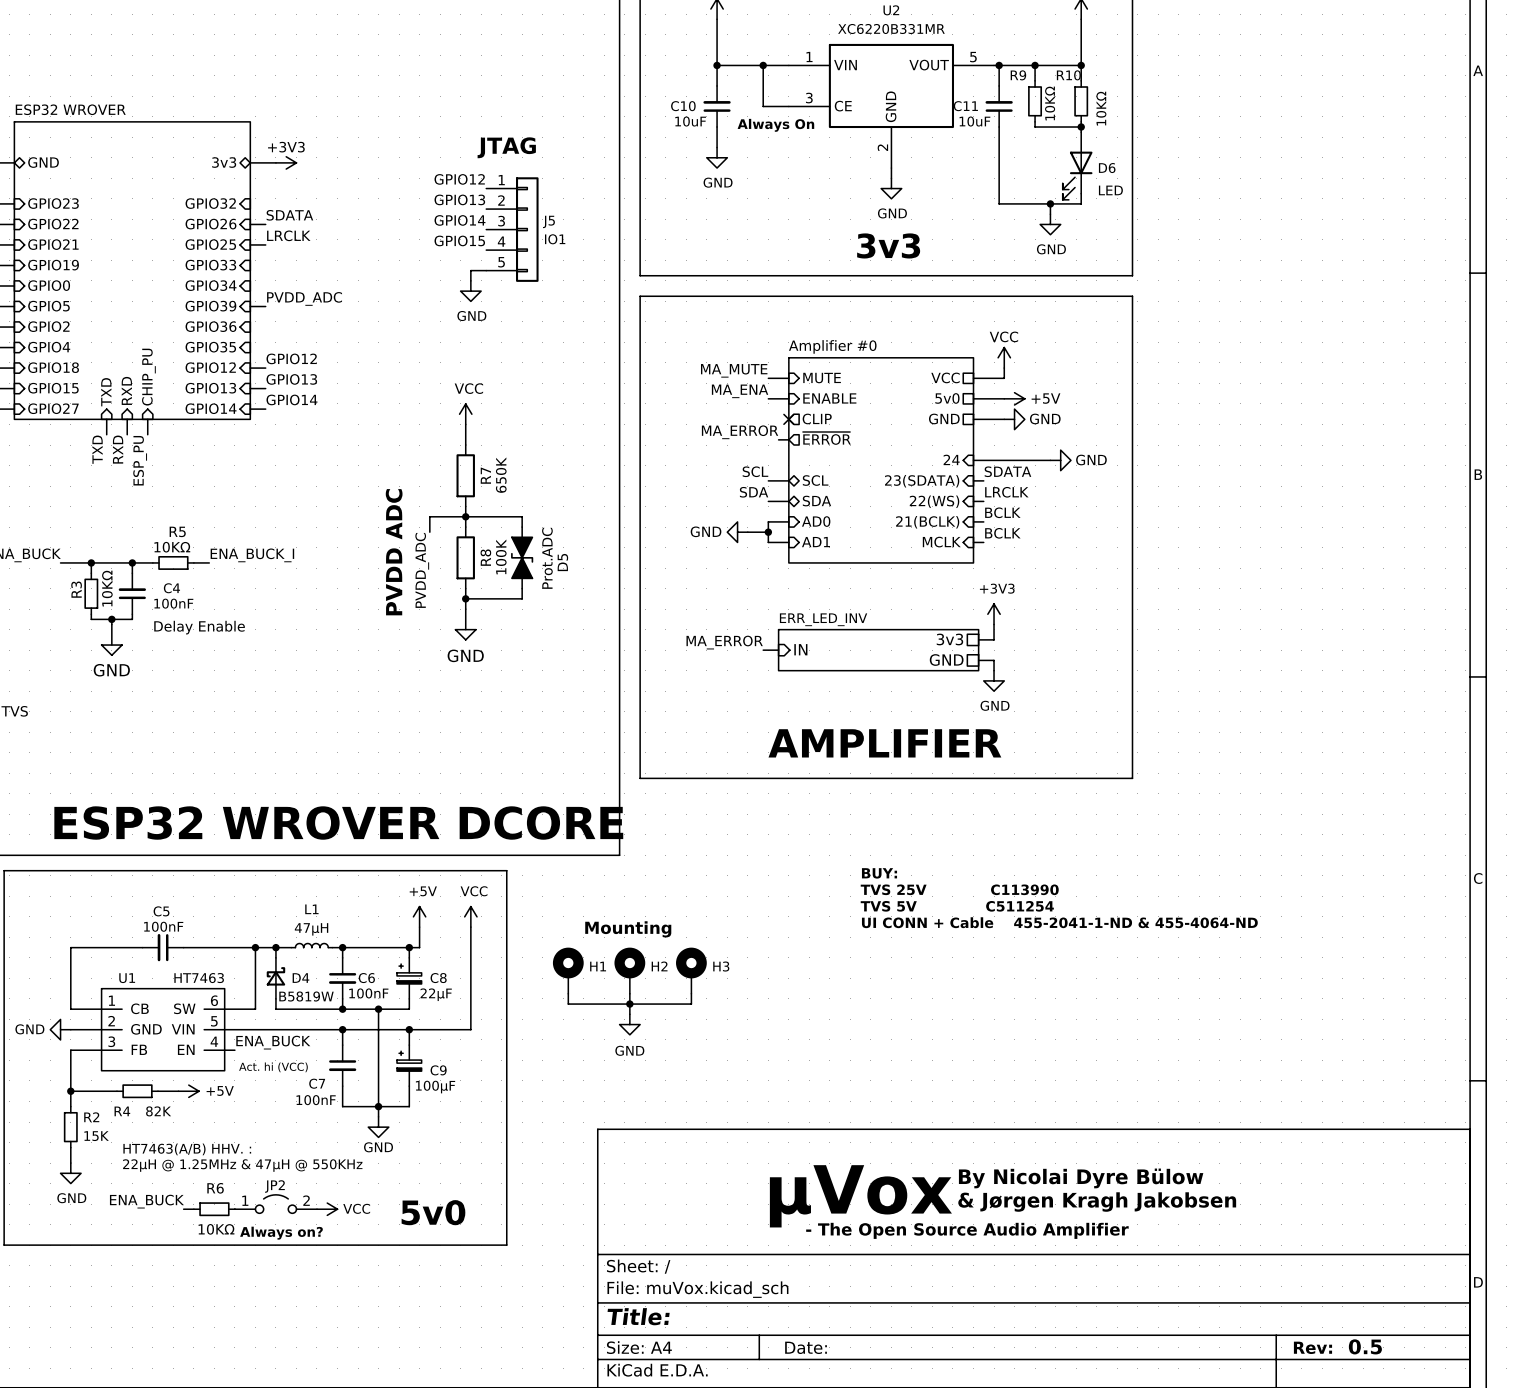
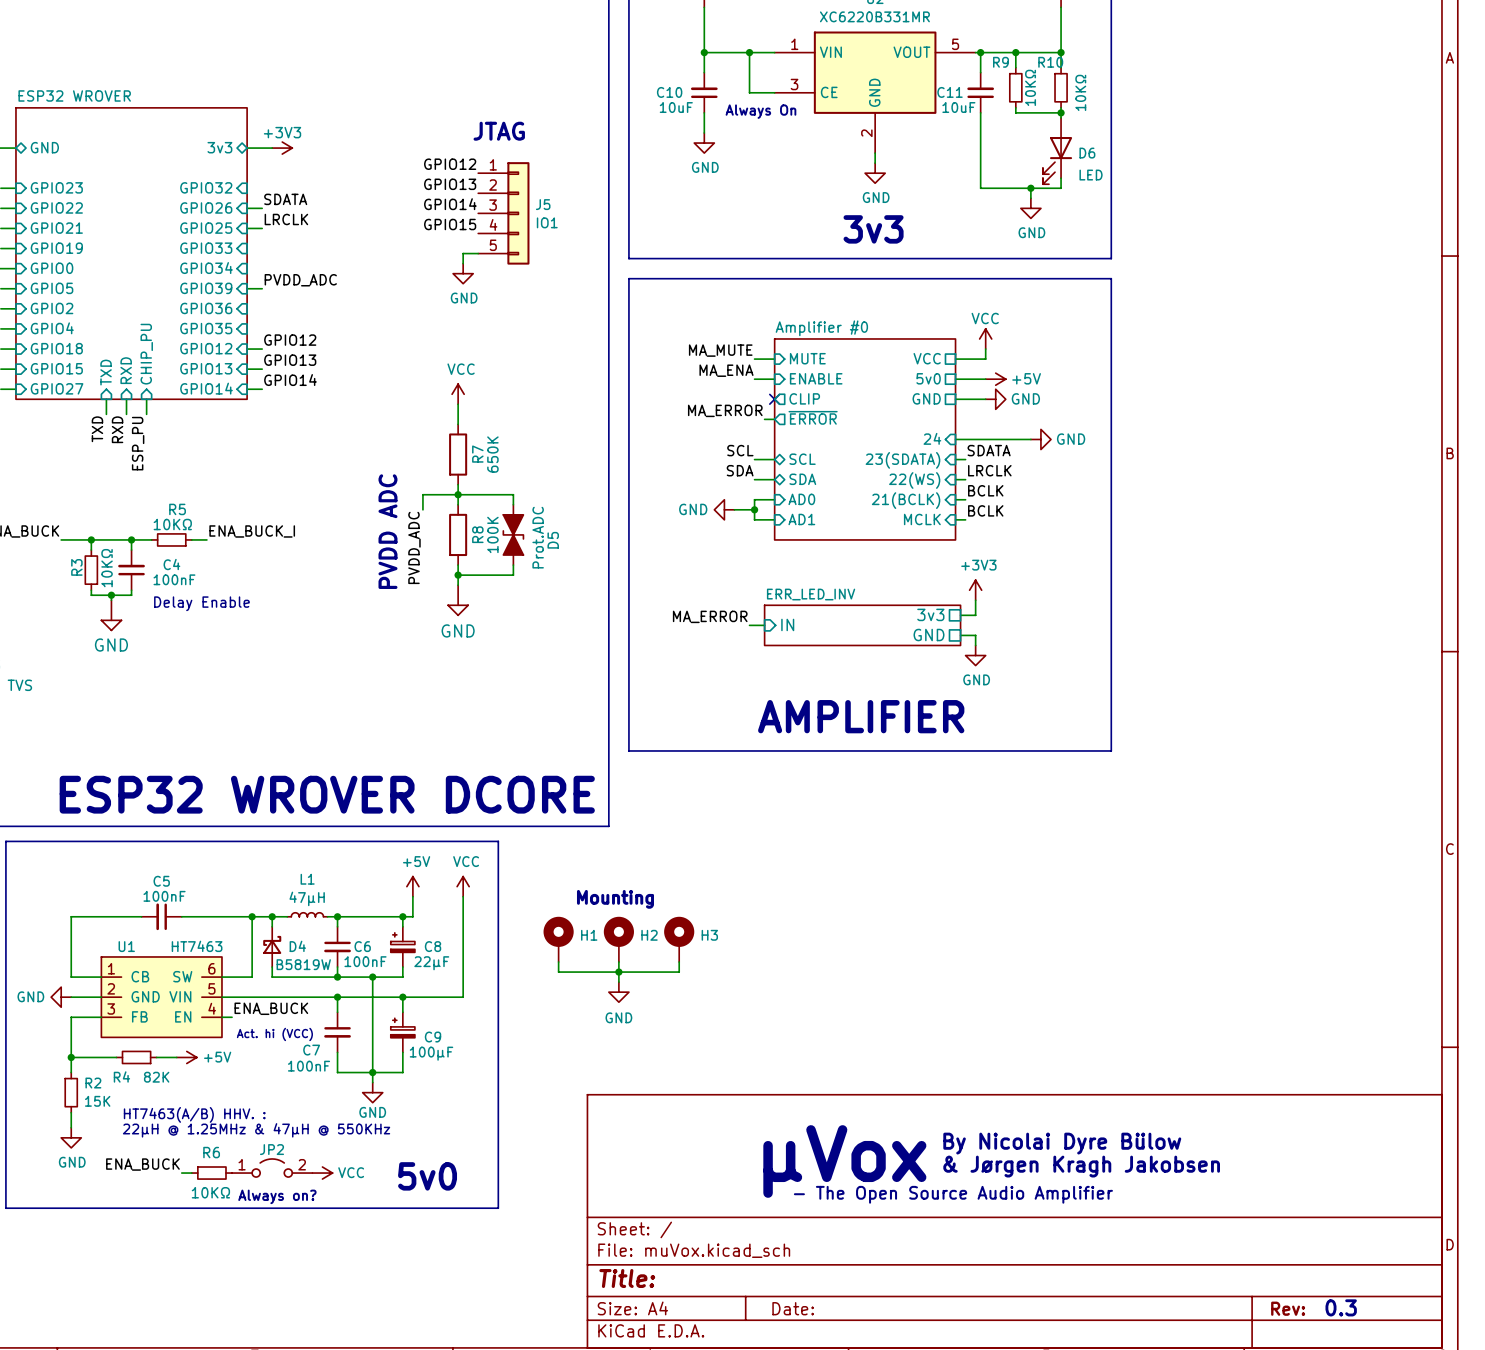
text: BUY: (879, 873) -> none
text: TVS 25V C113990 (959, 889) -> none
text: TVS 5V C511254 (957, 906) -> none
text: UI CONN + Cable 455-2041-1-ND & 455-4064-ND (1059, 922) -> none
text: 0.5 (1365, 1346) -> 0.3 (1341, 1307)

